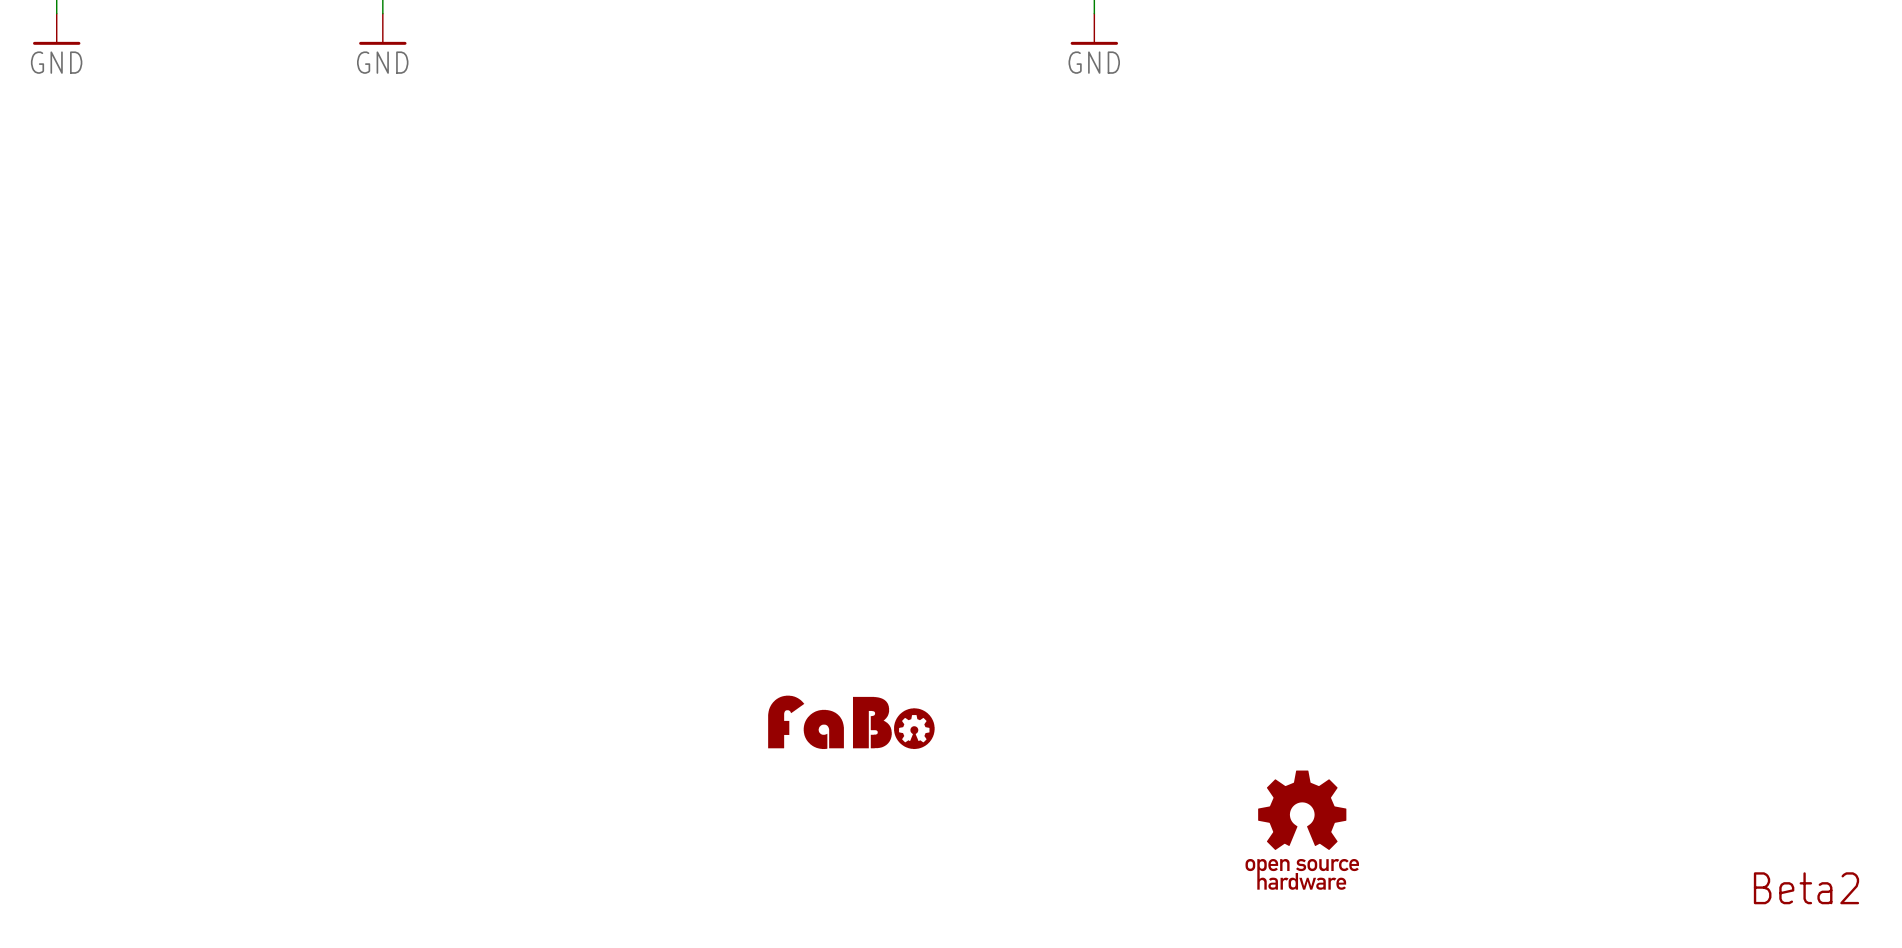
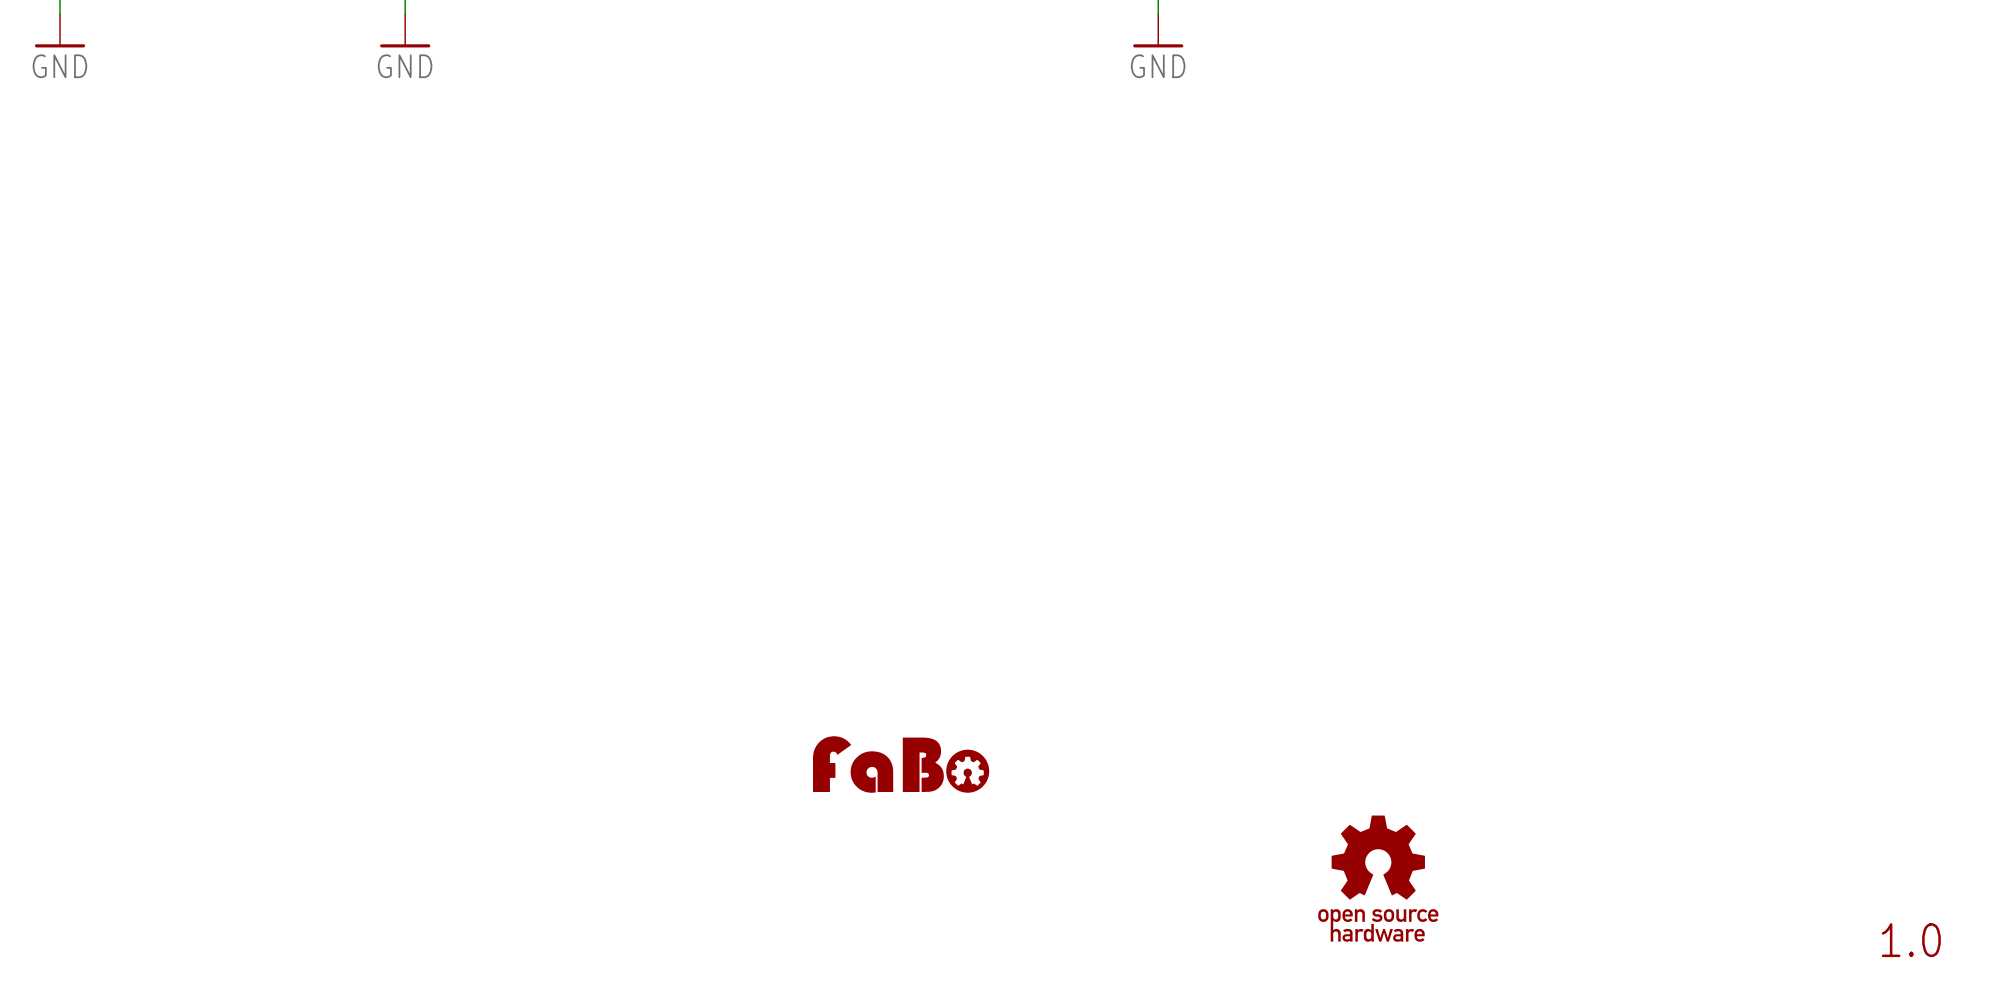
text: Beta2 (1806, 888) -> 1.0 (1911, 940)

